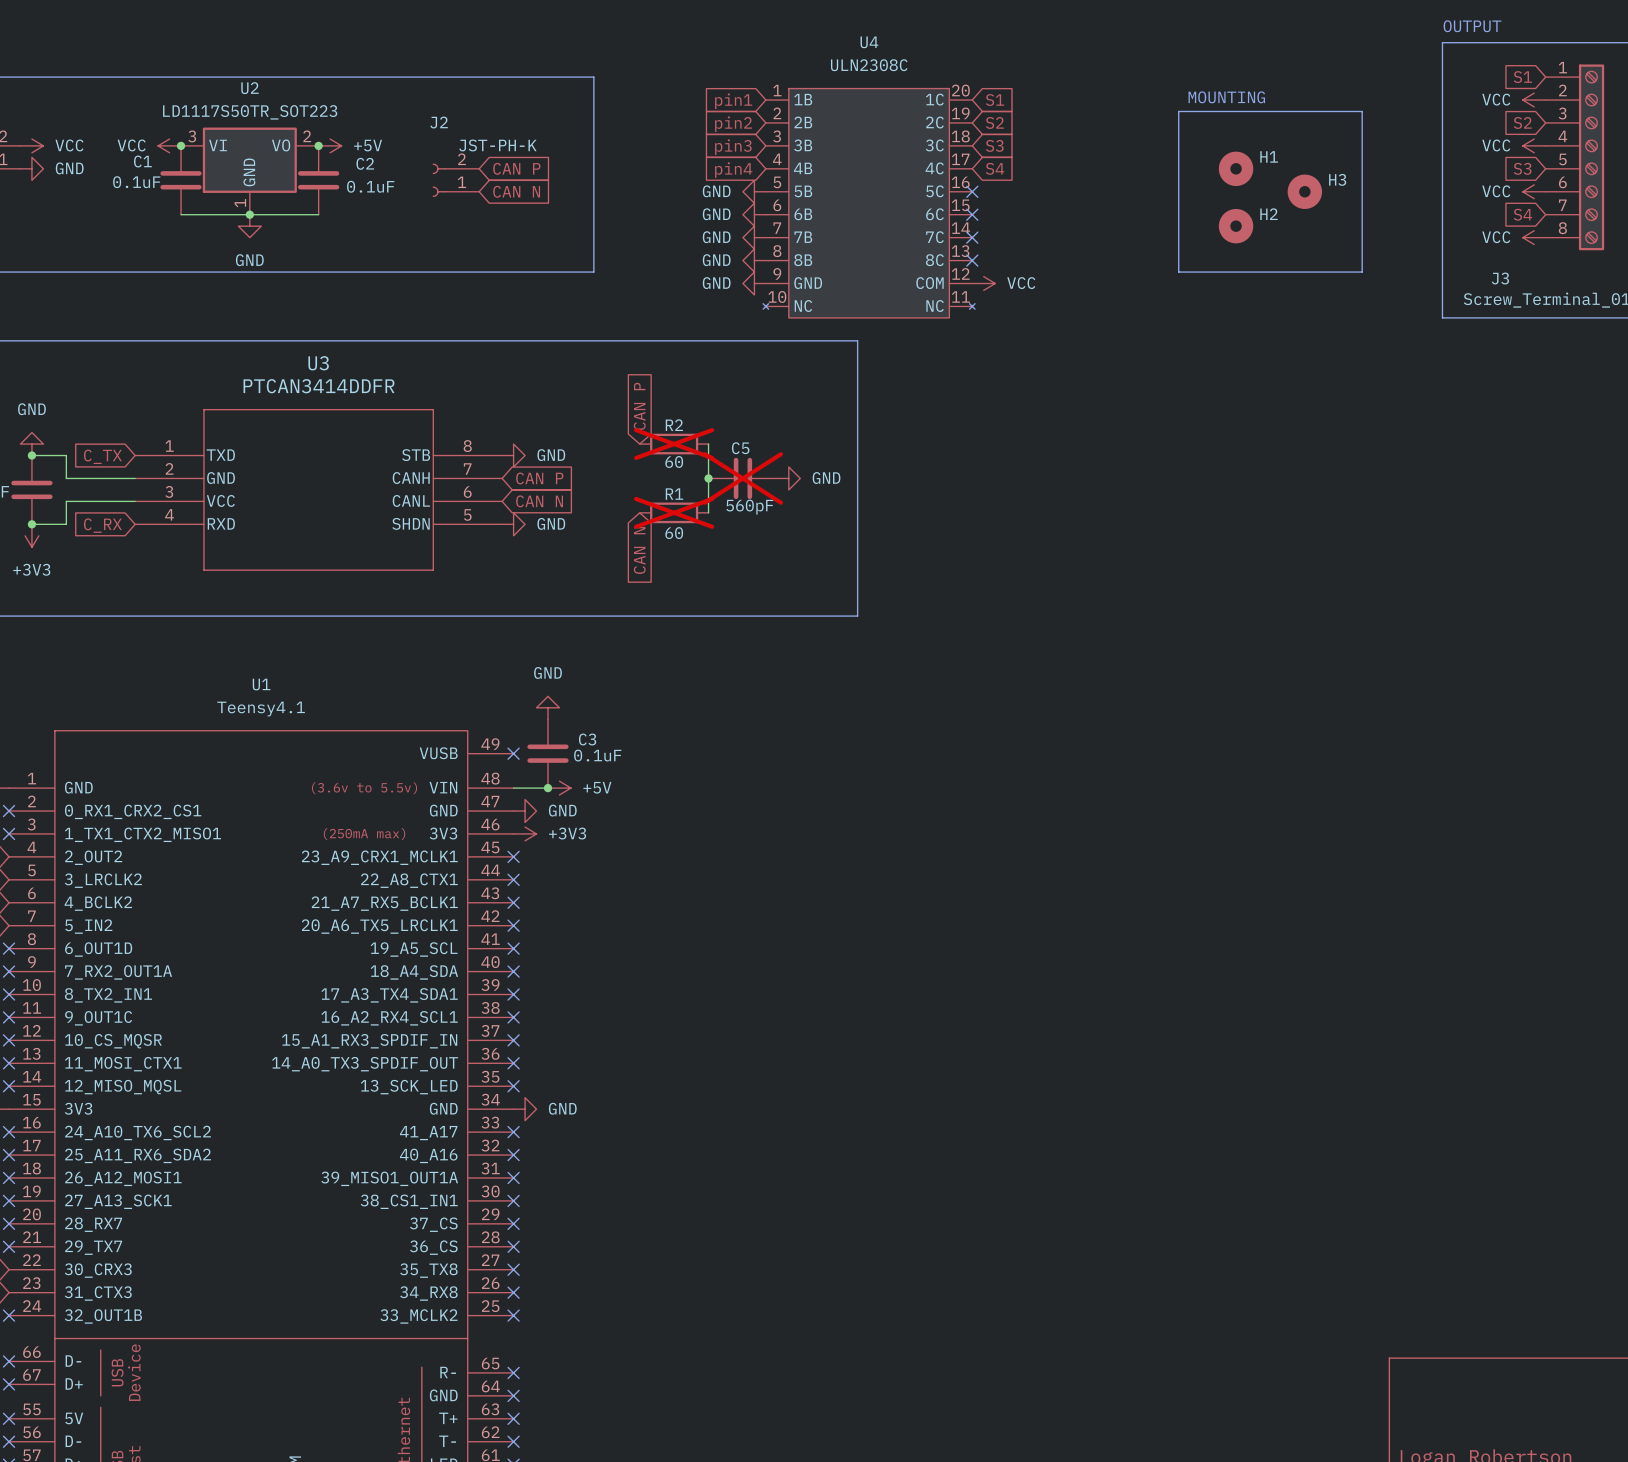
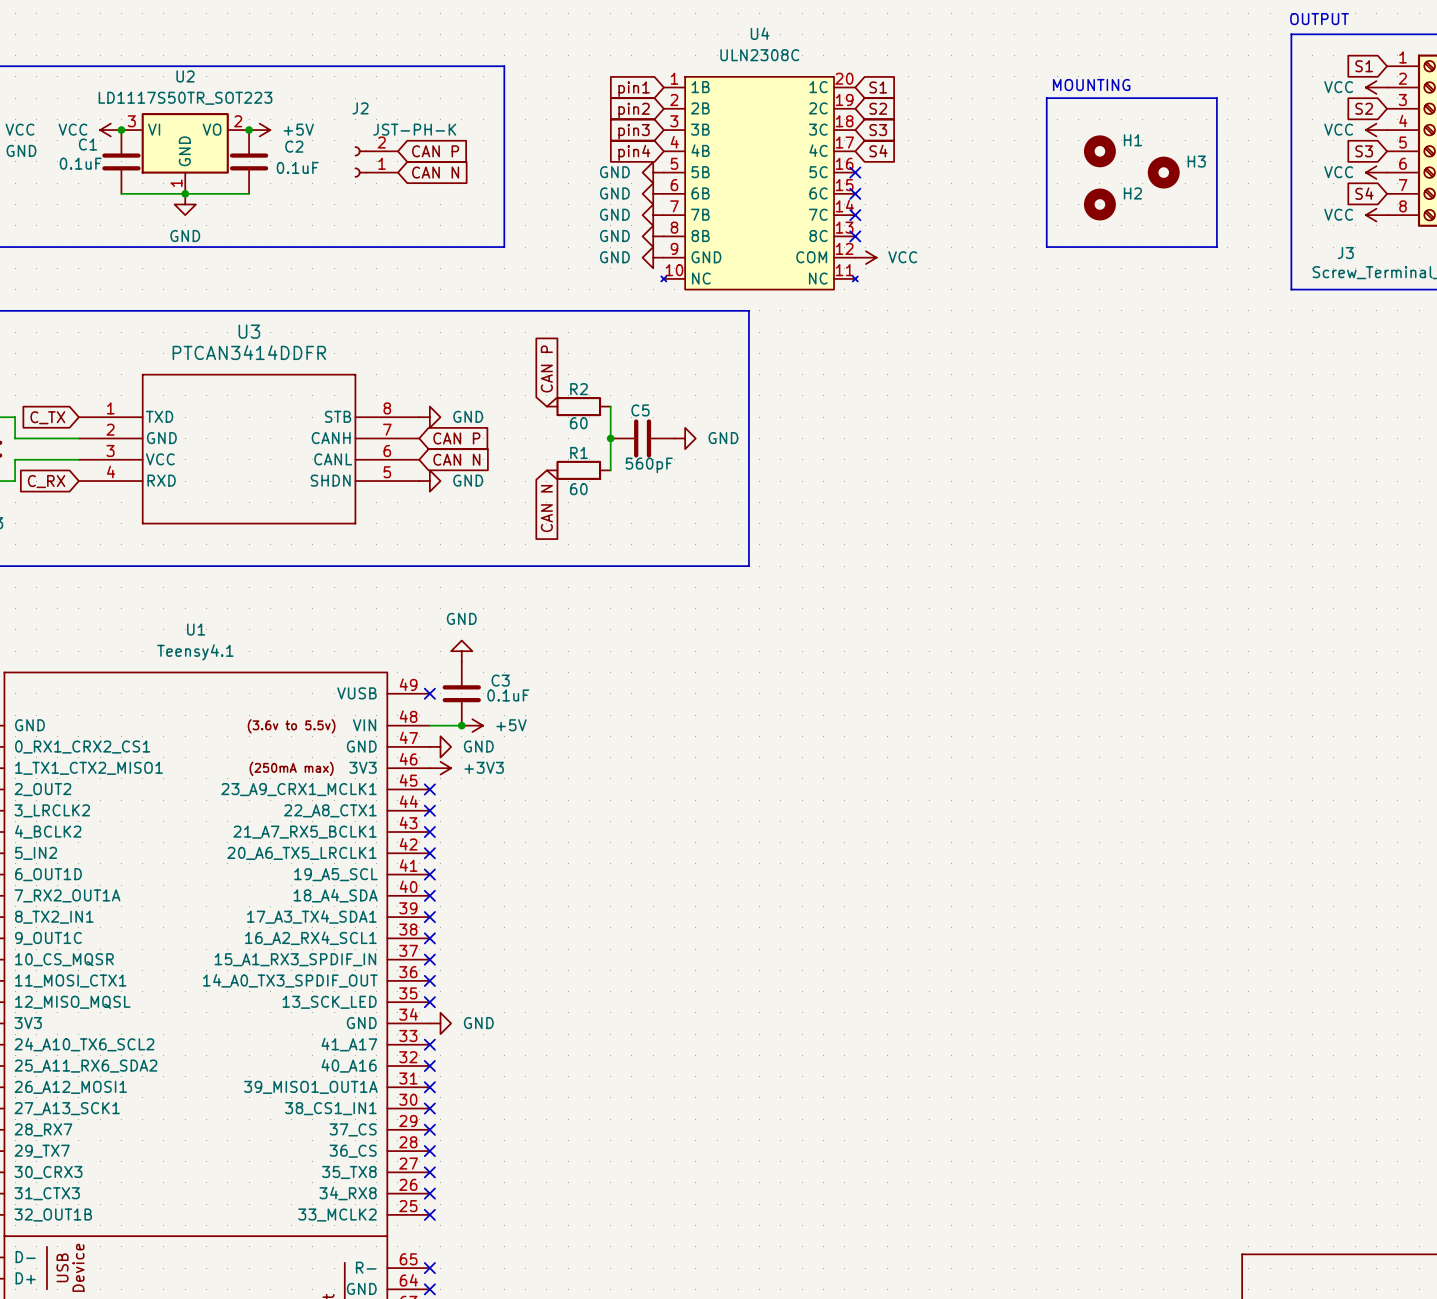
R2 do-not-place cross: (674, 444) -> none
C5 do-not-place cross: (742, 478) -> none
R1 do-not-place cross: (674, 512) -> none

